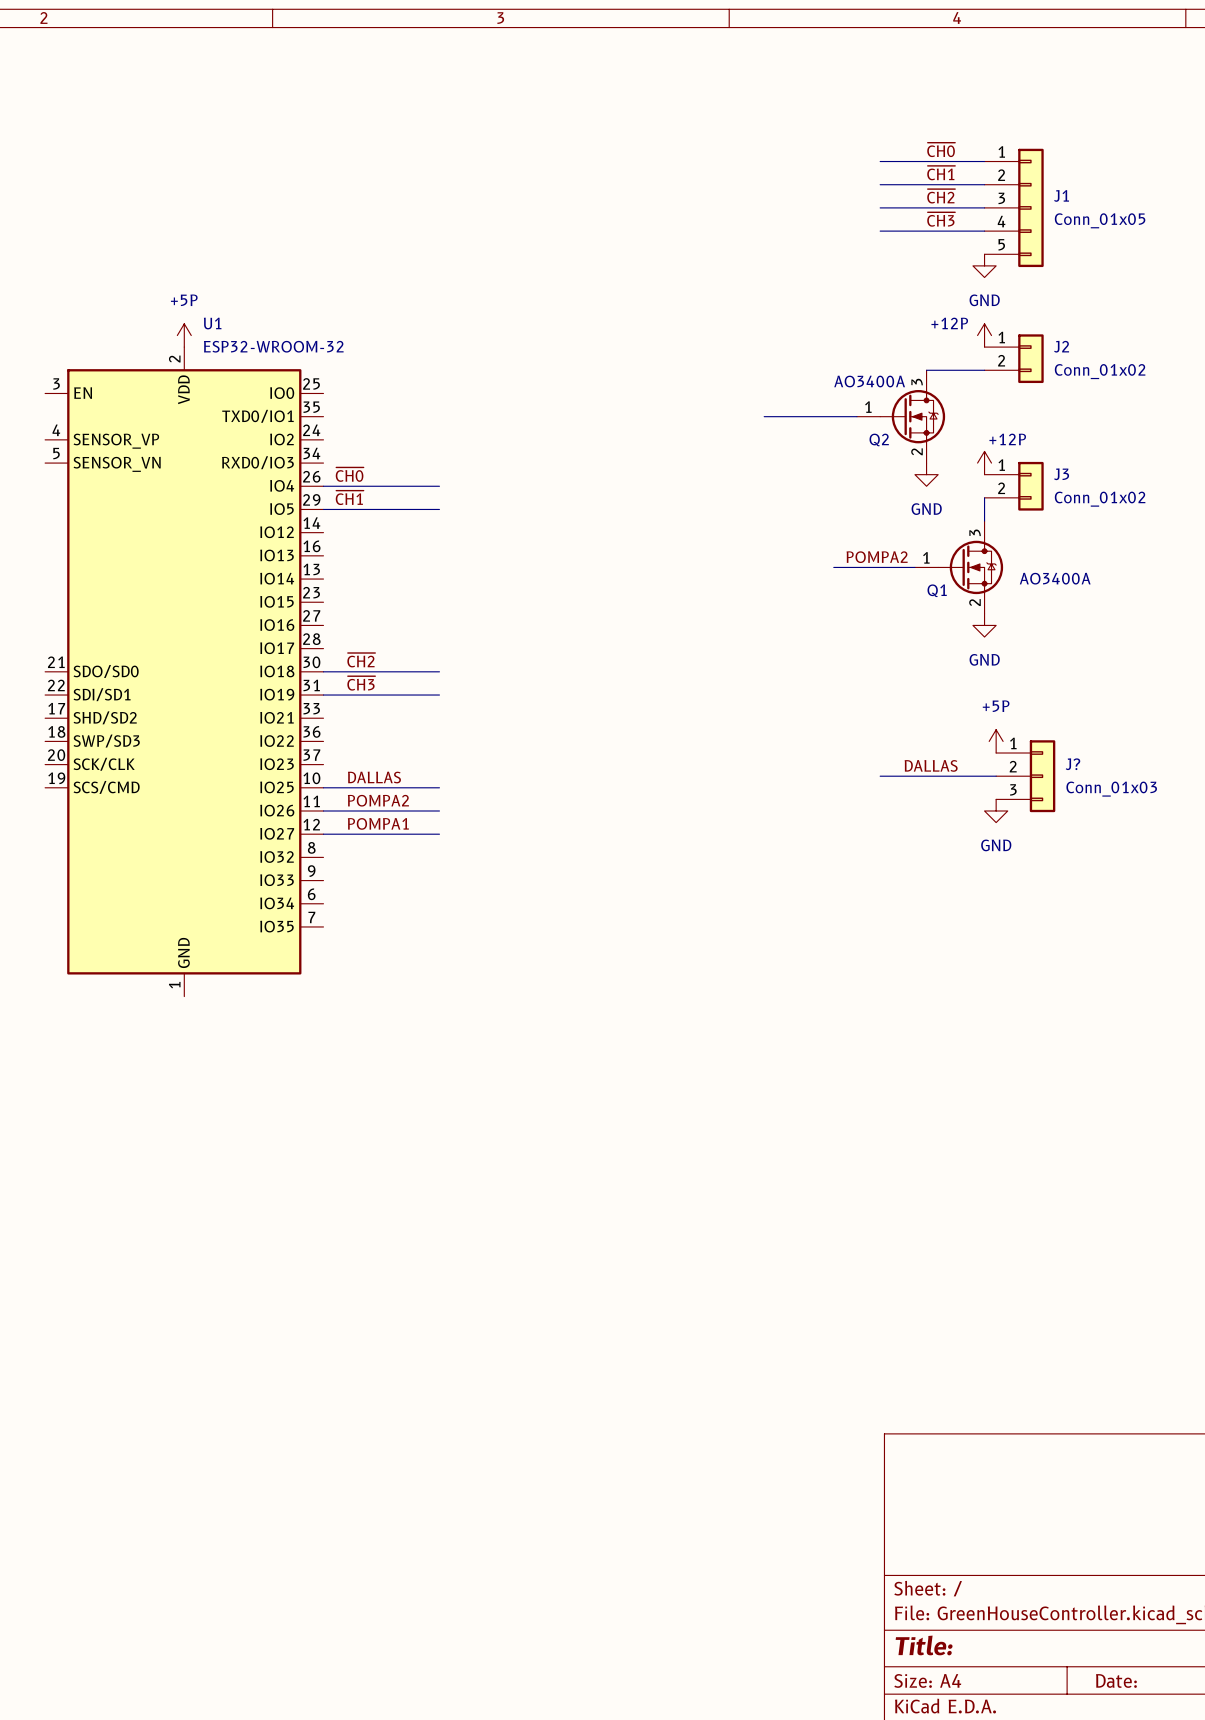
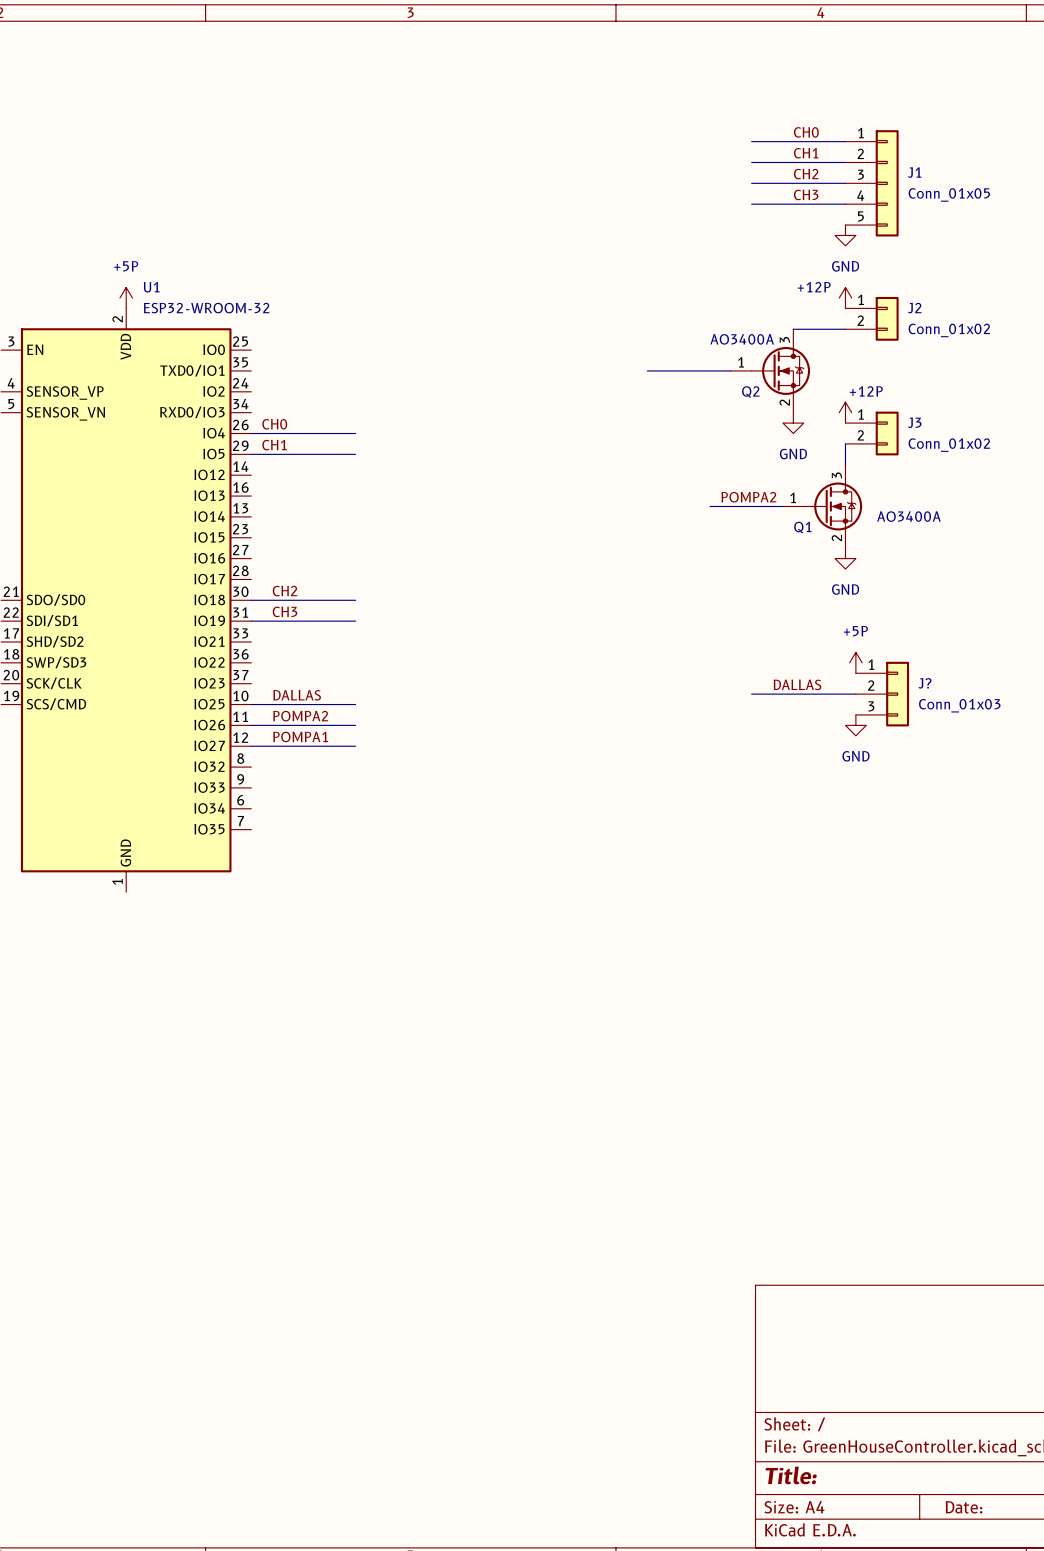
label: ~{CH0} (941, 149) -> CH0 (806, 132)
label: ~{CH1} (941, 173) -> CH1 (806, 153)
label: ~{CH2} (941, 196) -> CH2 (806, 174)
label: ~{CH3} (941, 219) -> CH3 (806, 194)
label: ~{CH0} (349, 474) -> CH0 (274, 424)
label: ~{CH1} (349, 497) -> CH1 (274, 445)
label: ~{CH2} (361, 660) -> CH2 (284, 591)
label: ~{CH3} (361, 683) -> CH3 (285, 611)

